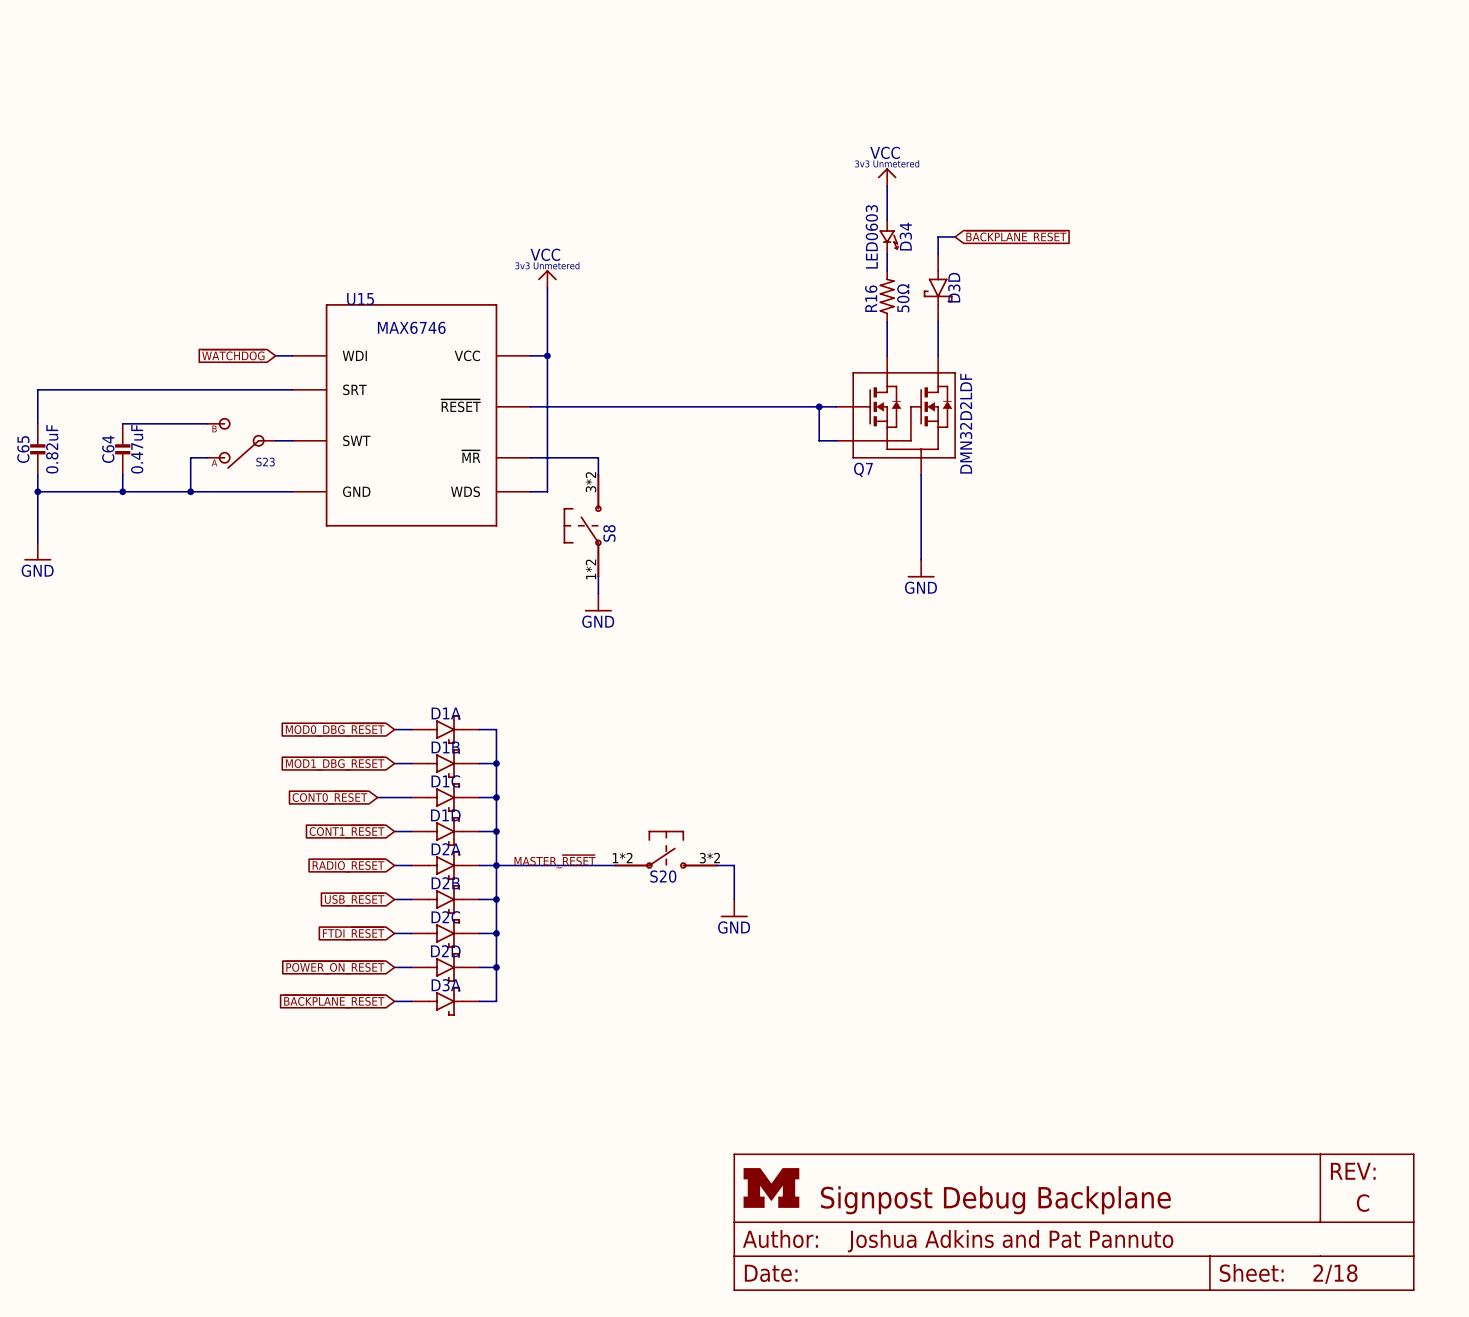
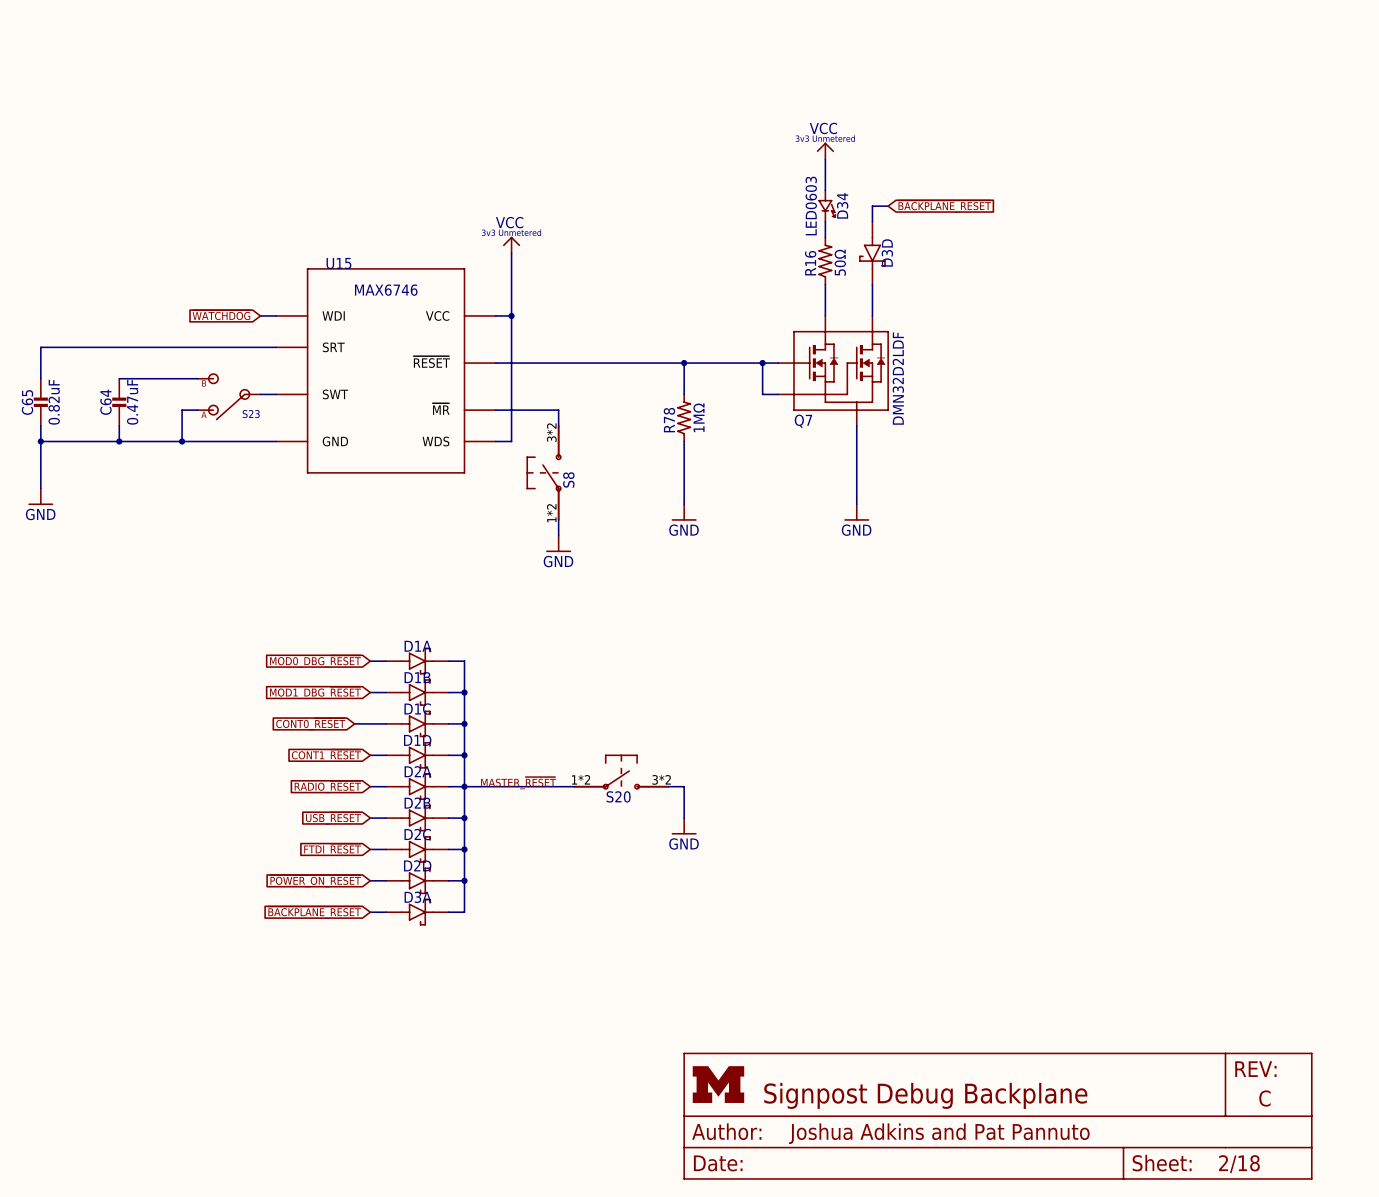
wire: none -> (684, 363) (684, 394)
junction: none -> (684, 363)
R78: none -> 1MΩ (684, 417)
wire: none -> (684, 441) (684, 504)
power symbol: none -> GND (684, 512)

